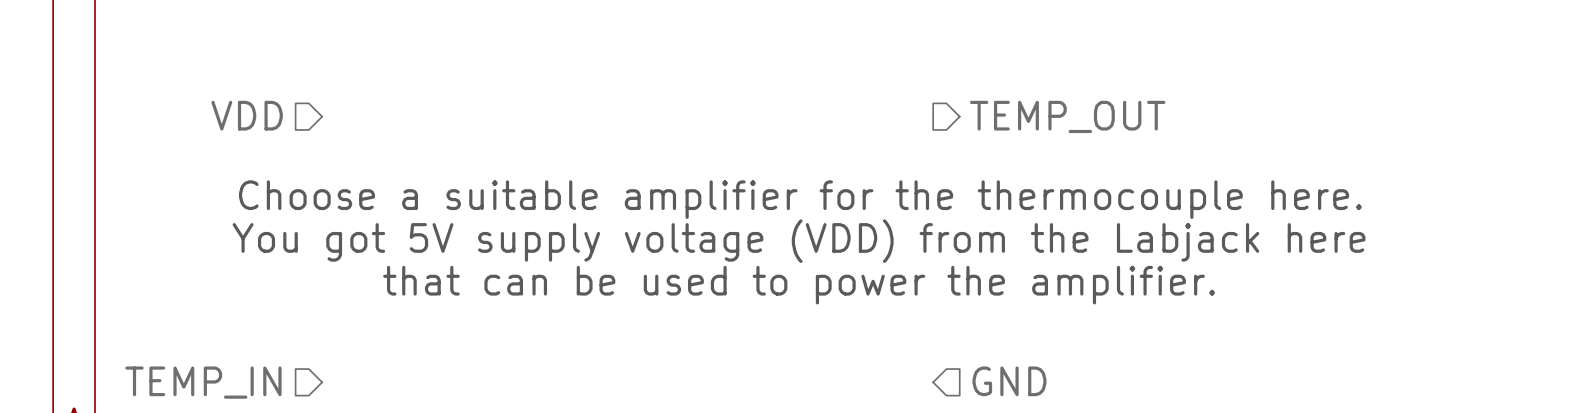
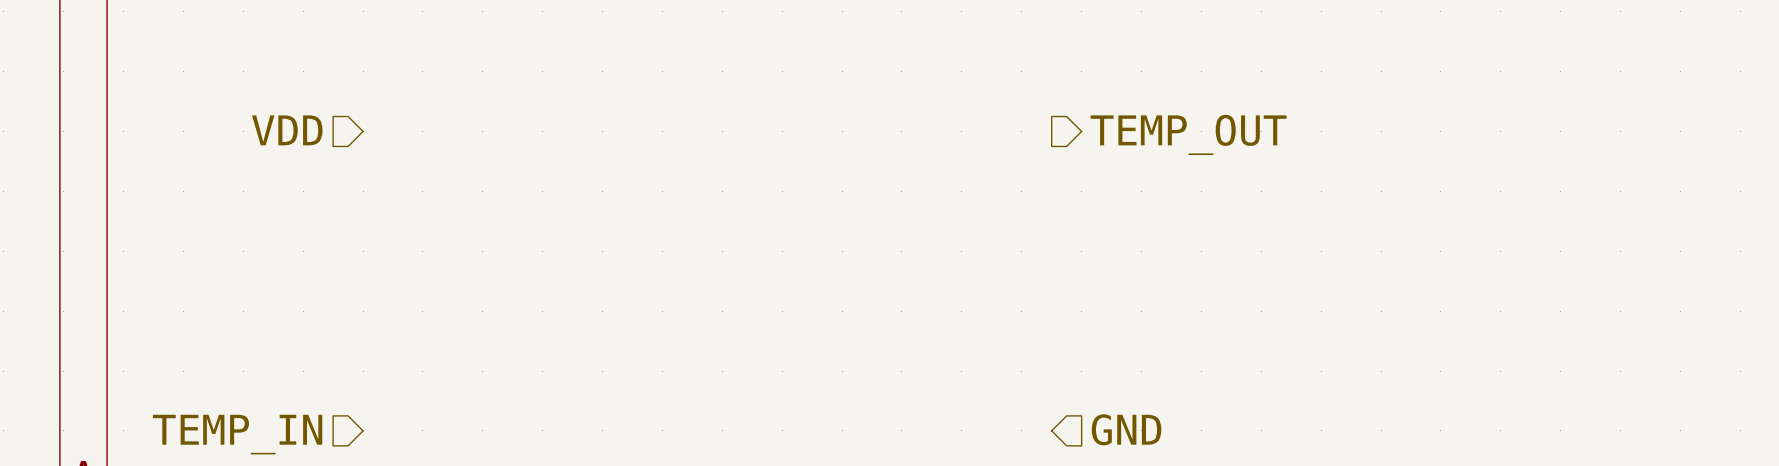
text: Choose a suitable amplifier for the thermocouple here. (800, 199) -> none
text: You got 5V supply voltage (VDD) from the Labjack here (799, 241) -> none
text: that can be used to power the amplifier. (799, 285) -> none

